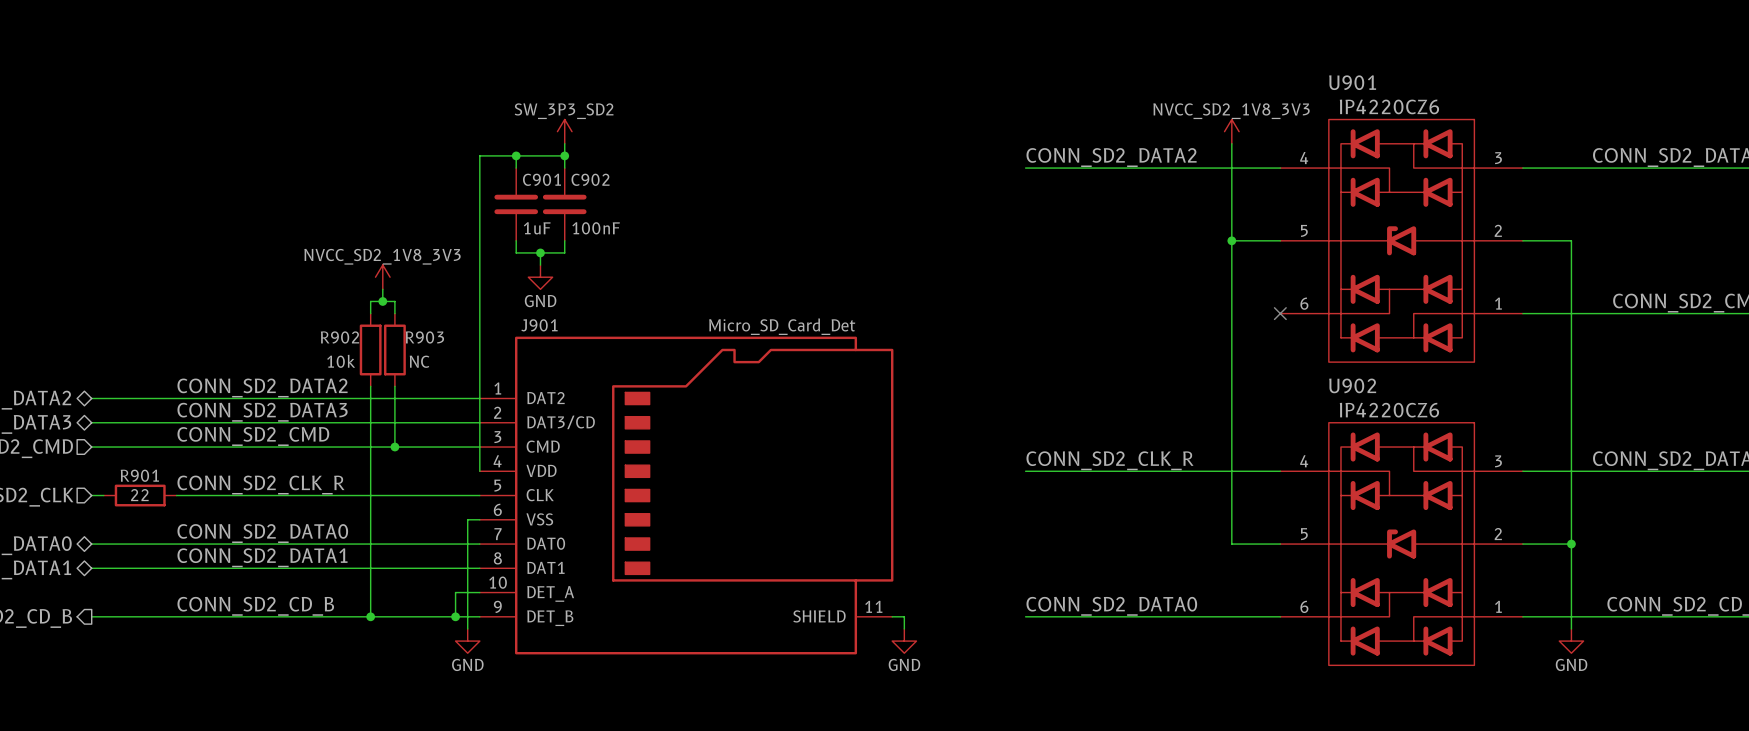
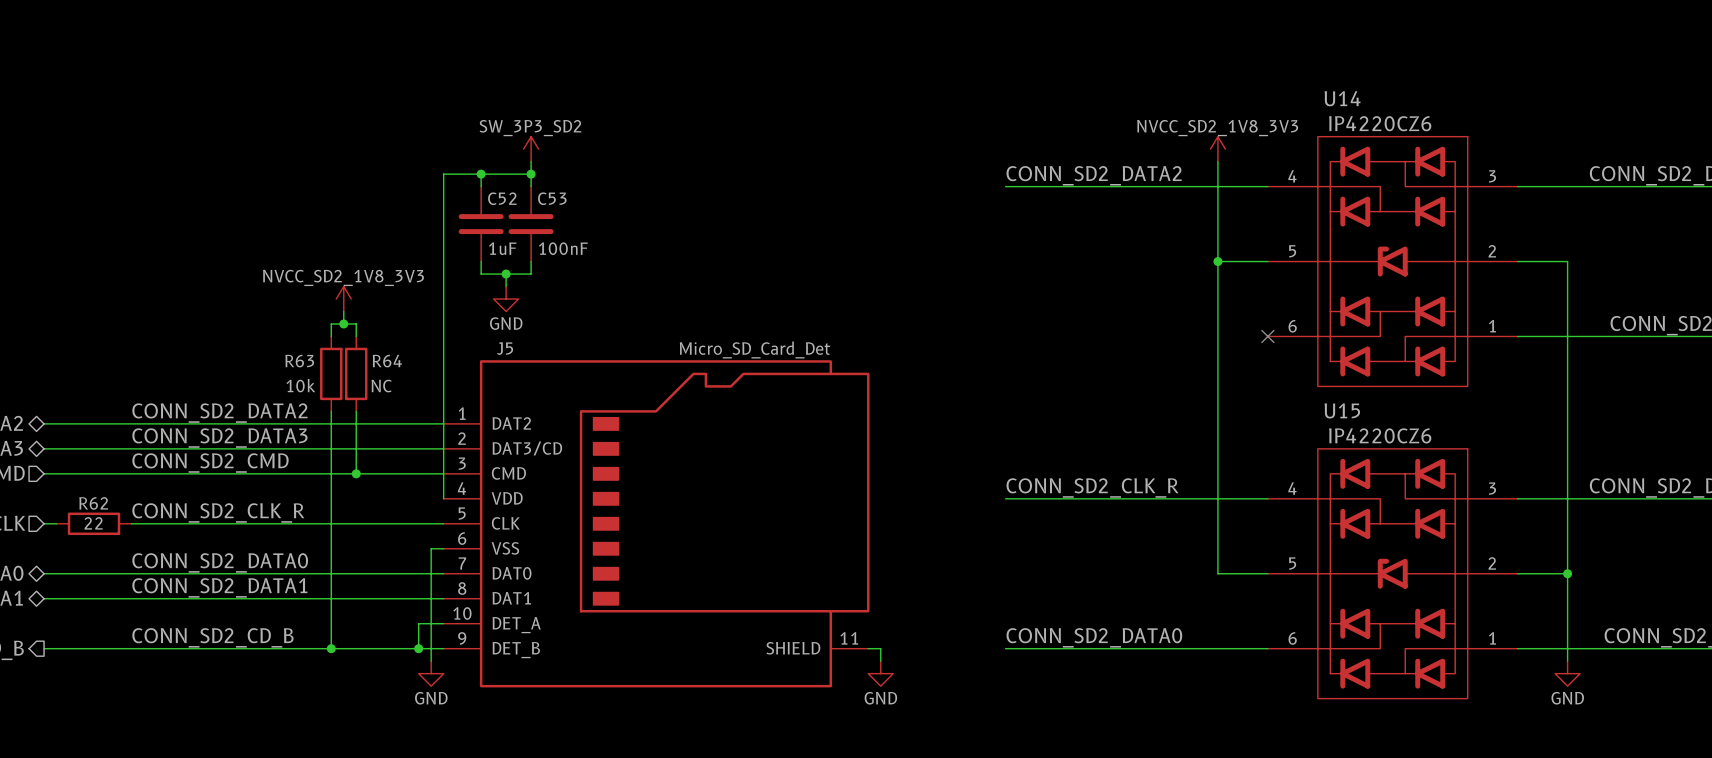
U901 name: U901 (1352, 82) -> U14 (1342, 98)
C901 name: C901 (541, 179) -> C52 (502, 198)
C902 name: C902 (590, 179) -> C53 (552, 198)
J901 name: J901 (539, 325) -> J5 (505, 348)
R902 name: R902 (339, 337) -> R63 (299, 361)
R903 name: R903 (424, 337) -> R64 (387, 361)
U902 name: U902 (1352, 385) -> U15 (1342, 410)
R901 name: R901 (139, 475) -> R62 (93, 503)

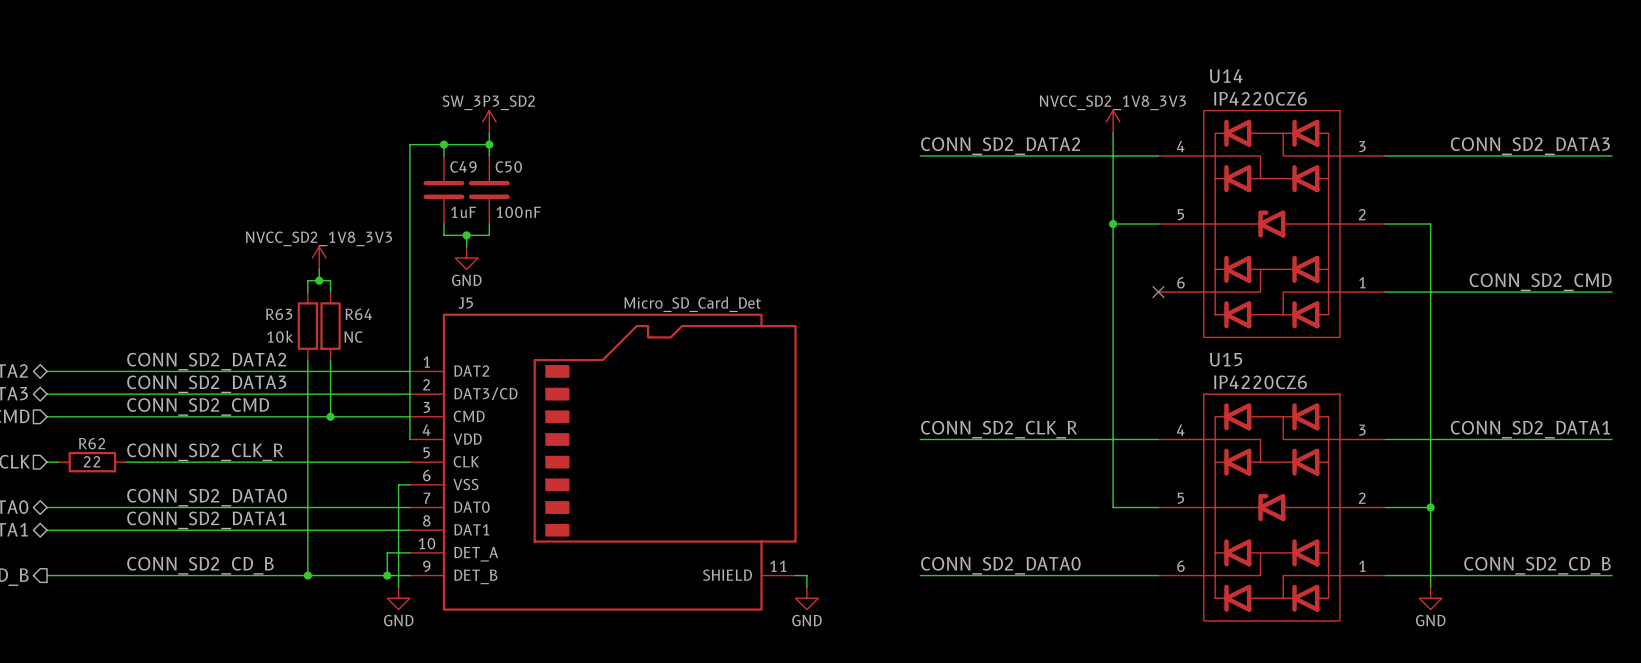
C52 name: C52 (502, 198) -> C49 (463, 166)
C53 name: C53 (552, 198) -> C50 (508, 166)

